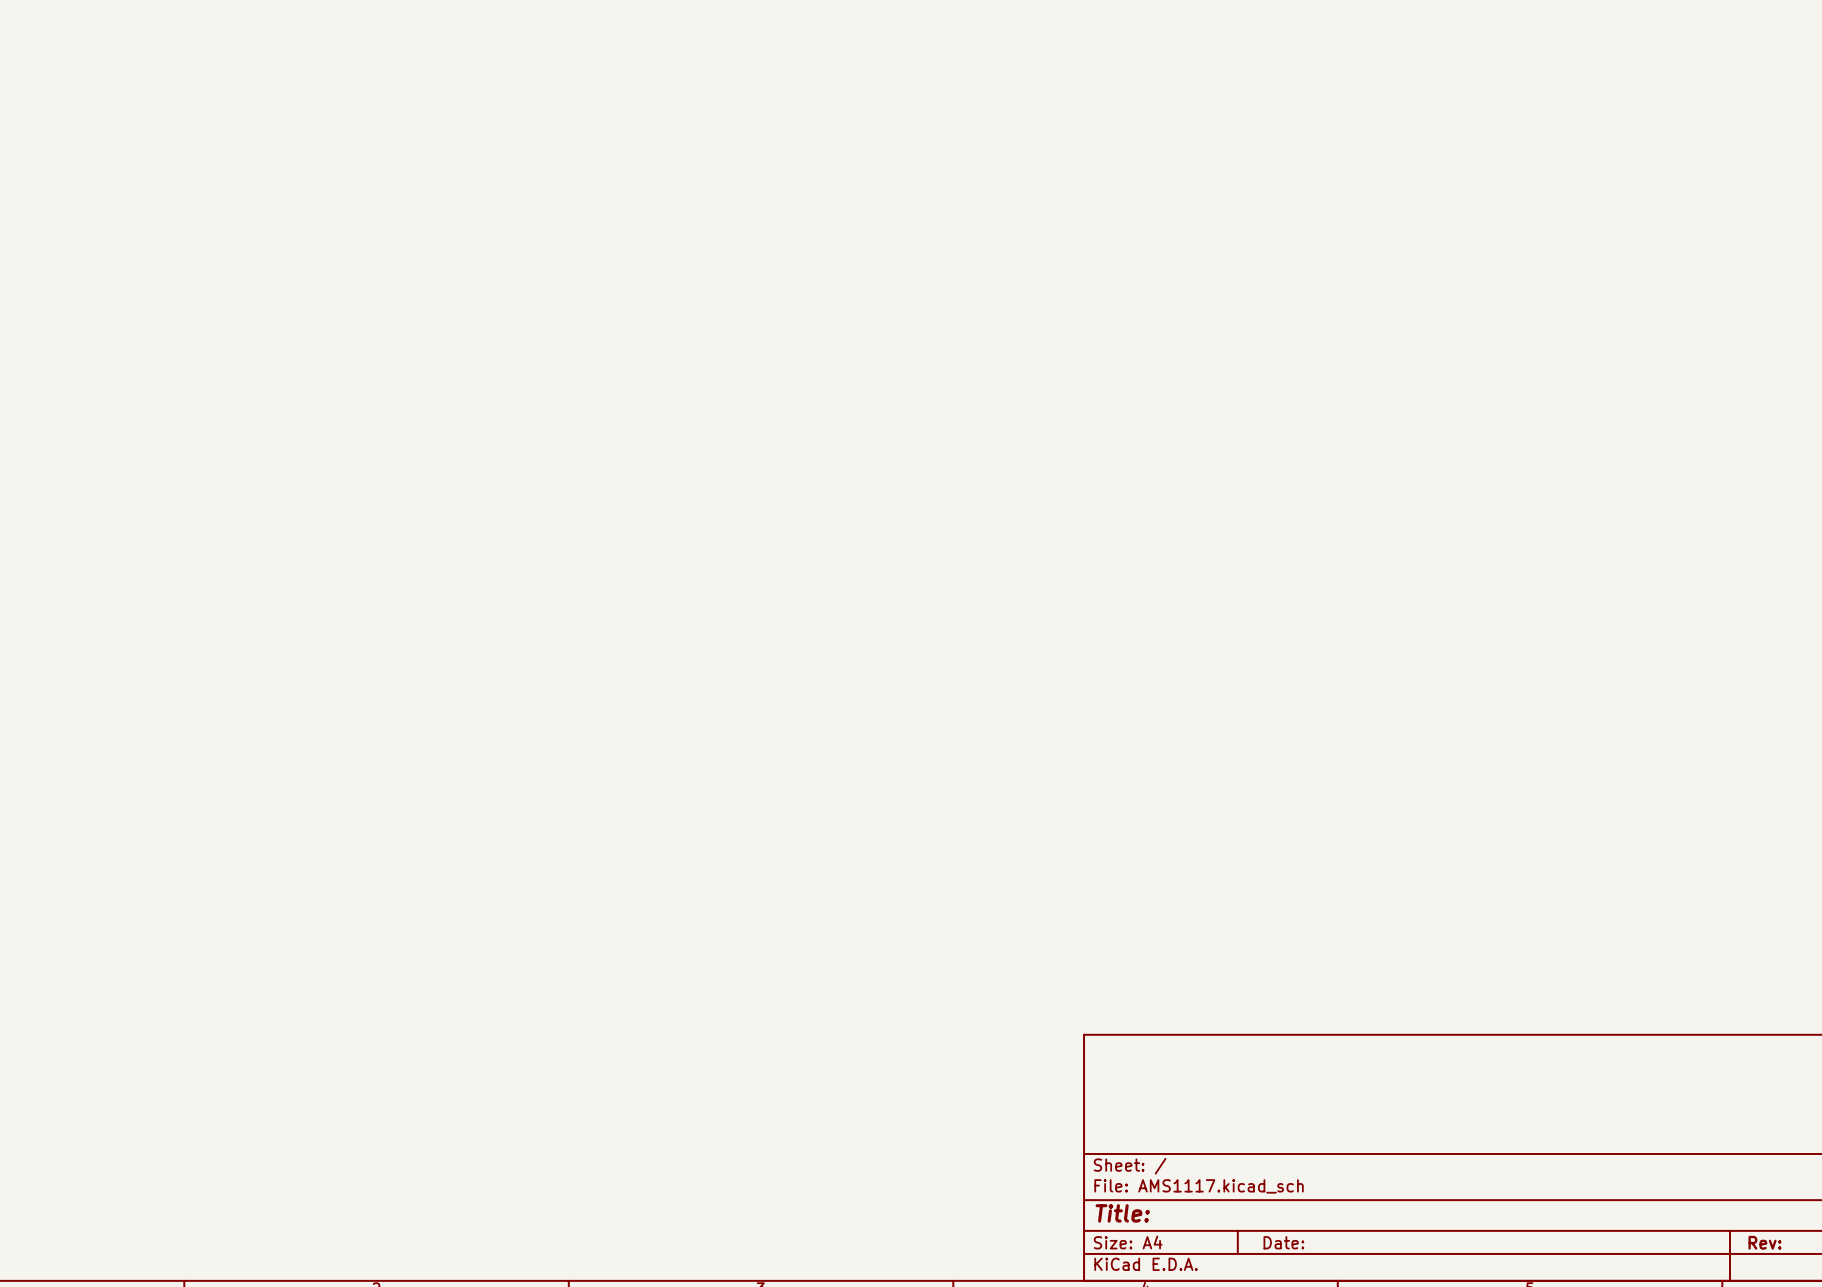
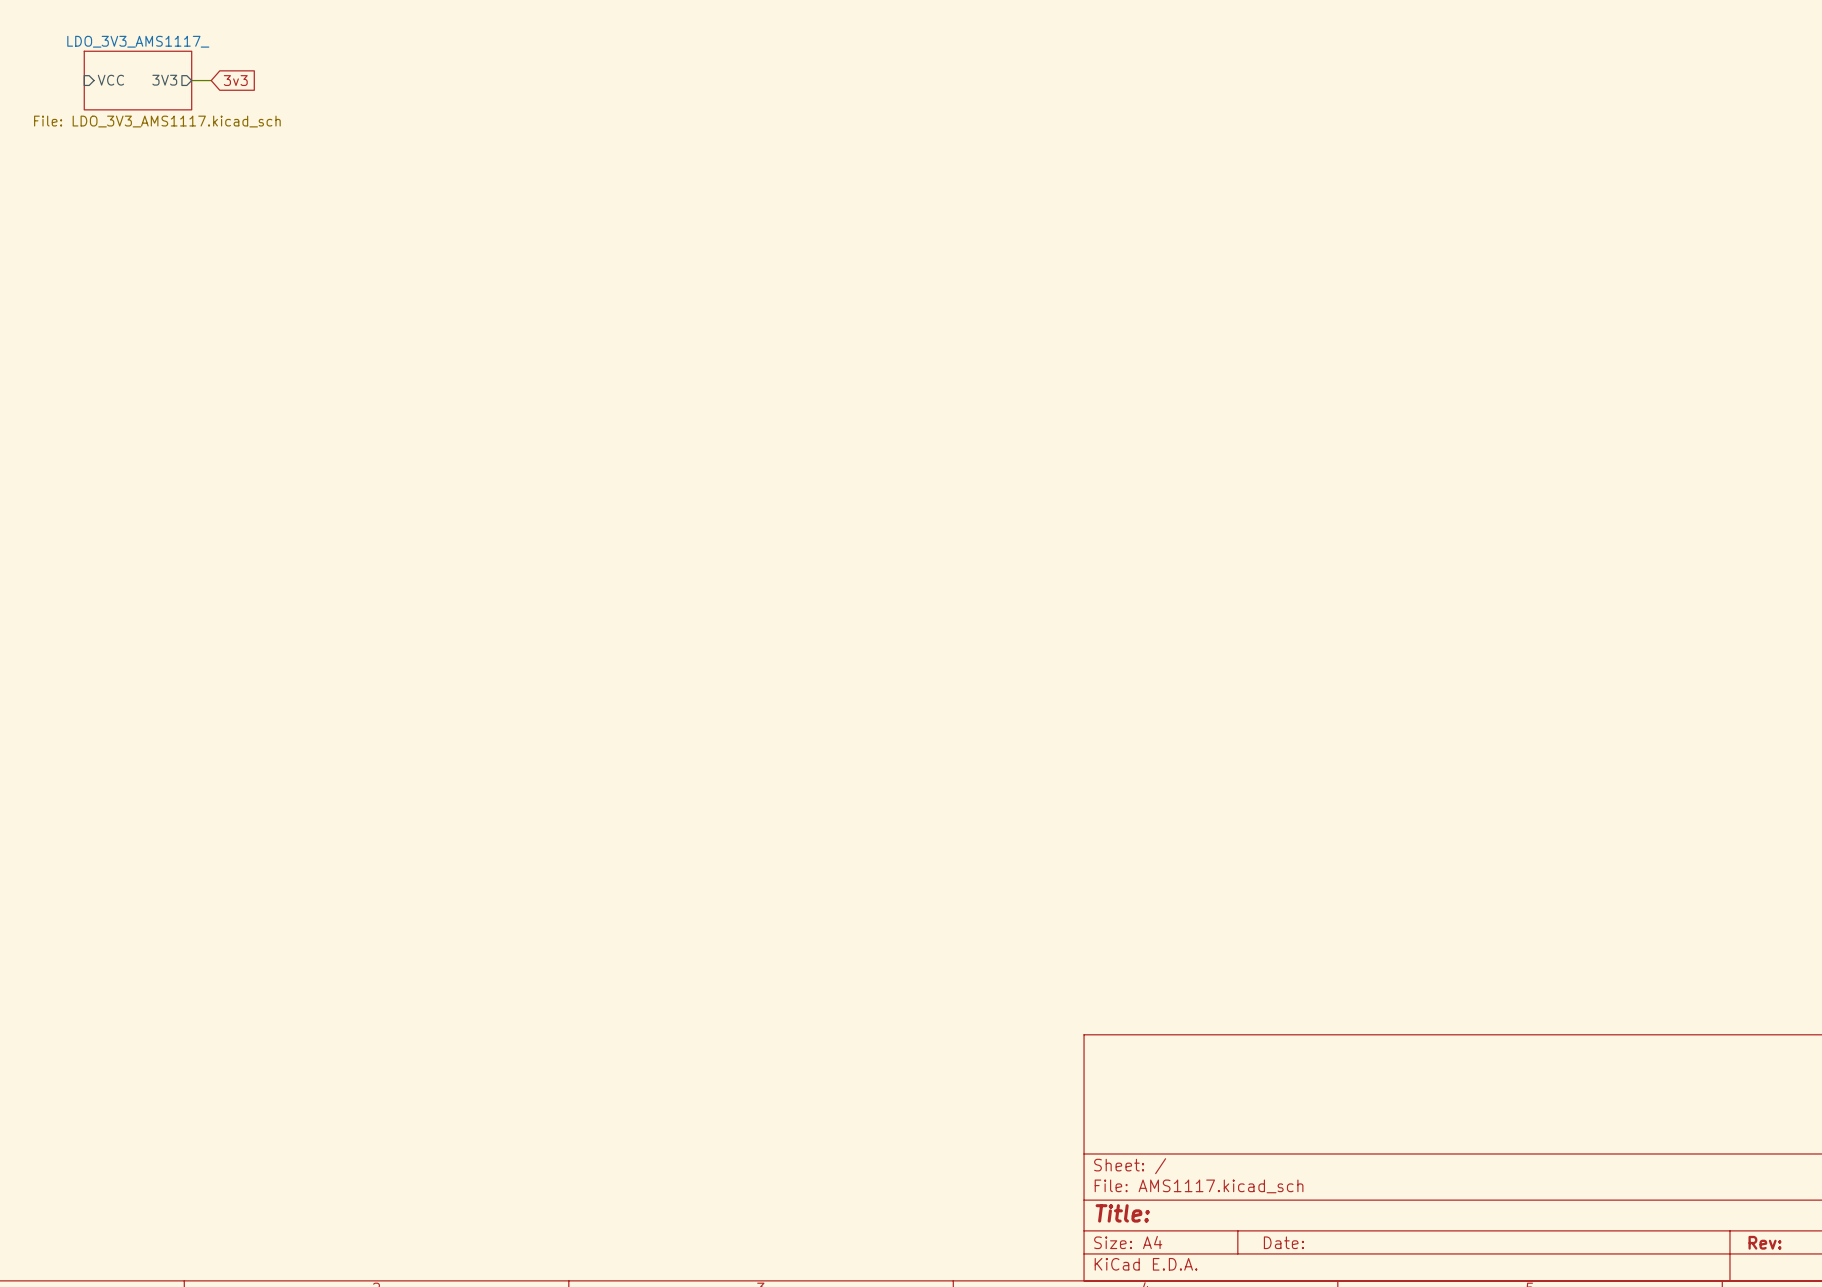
sheet pin: none -> VCC (110, 80)
sheet LDO_3V3_AMS1117_: none -> File: LDO_3V3_AMS1117.kicad_sch (137, 80)
sheet pin: none -> 3V3 (164, 80)
wire: none -> (191, 80) (211, 80)
global label: none -> 3v3 (235, 80)

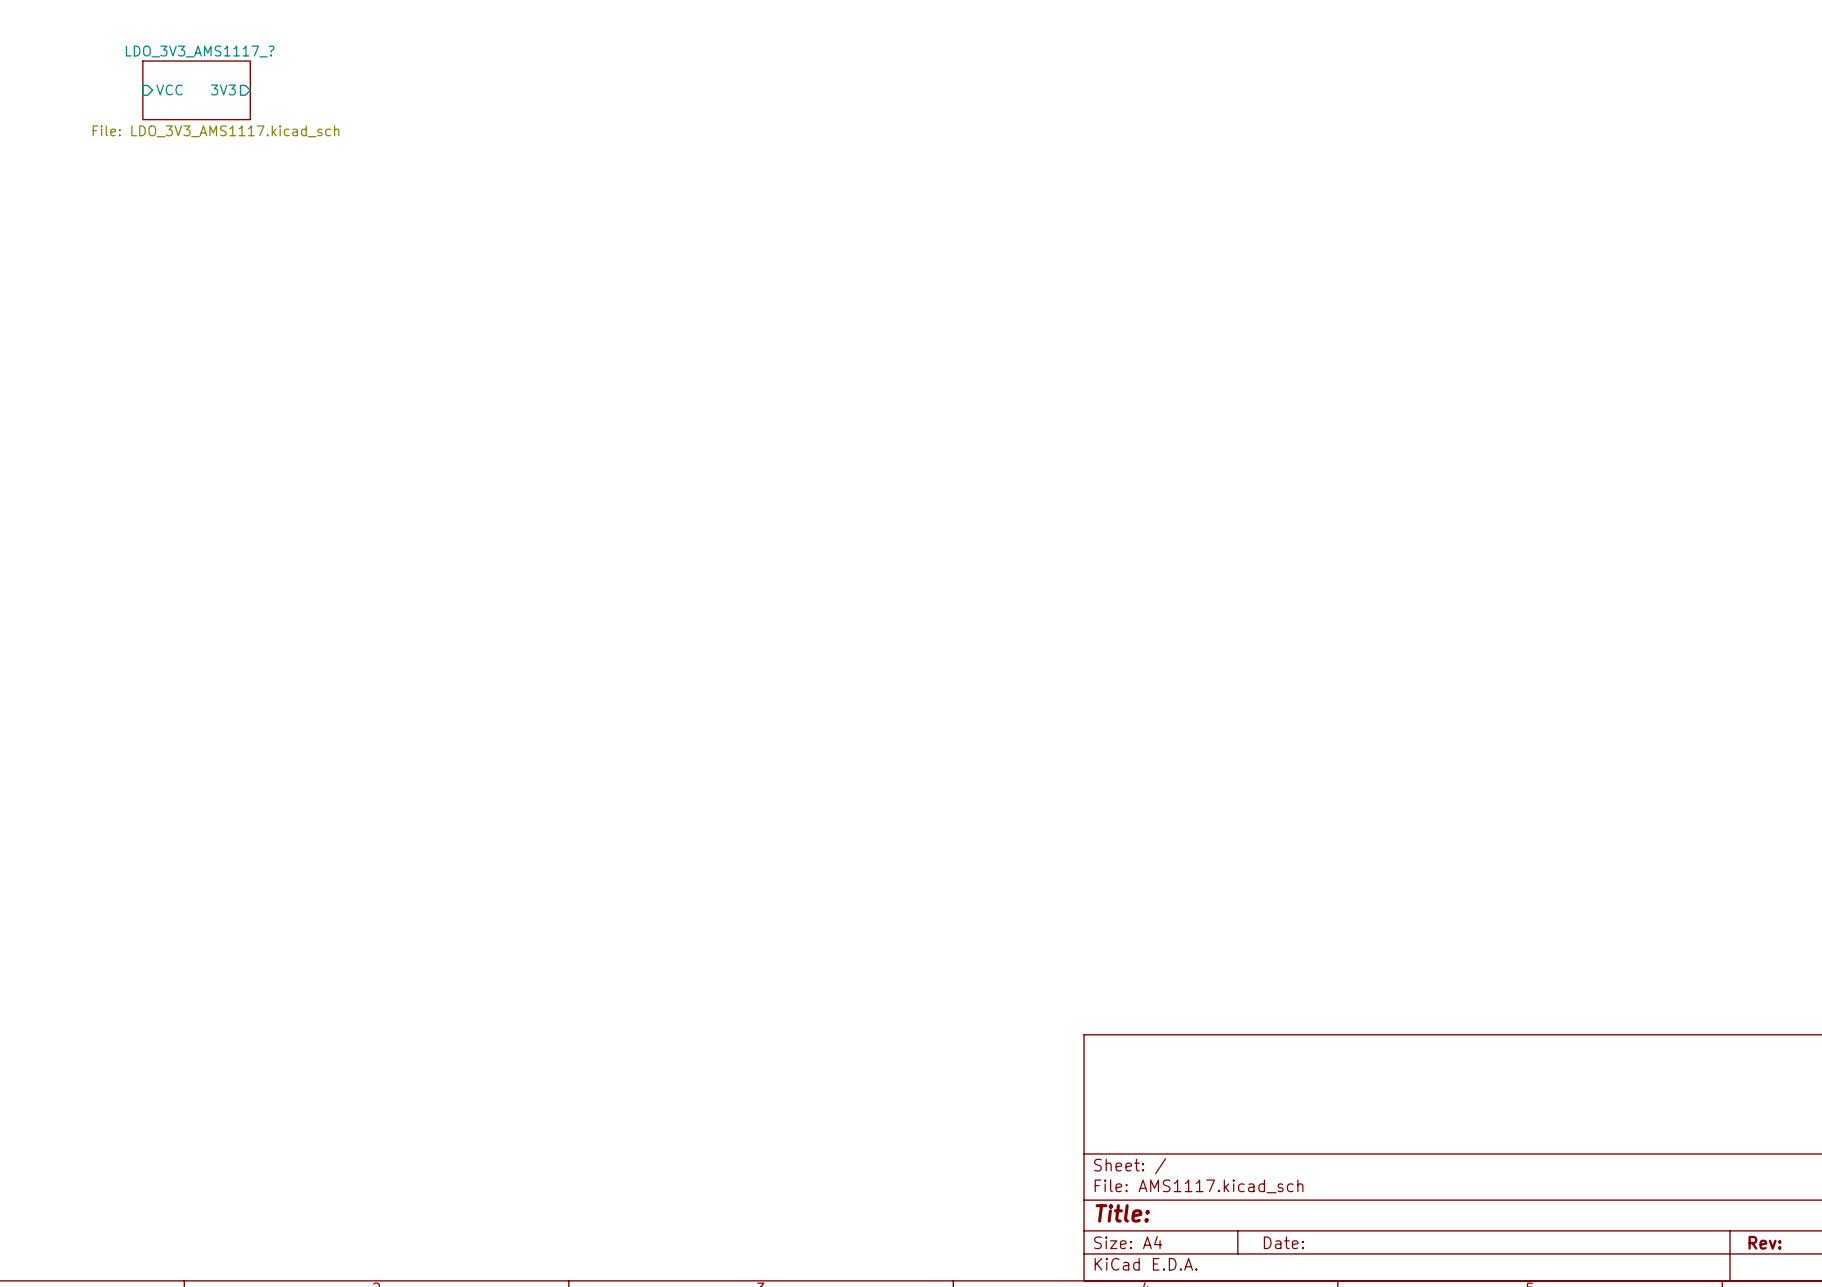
sheet pin position: VCC (110, 80) -> VCC (169, 89)
sheet LDO_3V3_AMS1117_: File: LDO_3V3_AMS1117.kicad_sch (137, 80) -> none
sheet pin position: 3V3 (164, 80) -> 3V3 (223, 89)
wire: (191, 80) (211, 80) -> none
global label: 3v3 (235, 80) -> none
sheet LDO_3V3_AMS1117_?: none -> File: LDO_3V3_AMS1117.kicad_sch (196, 90)

